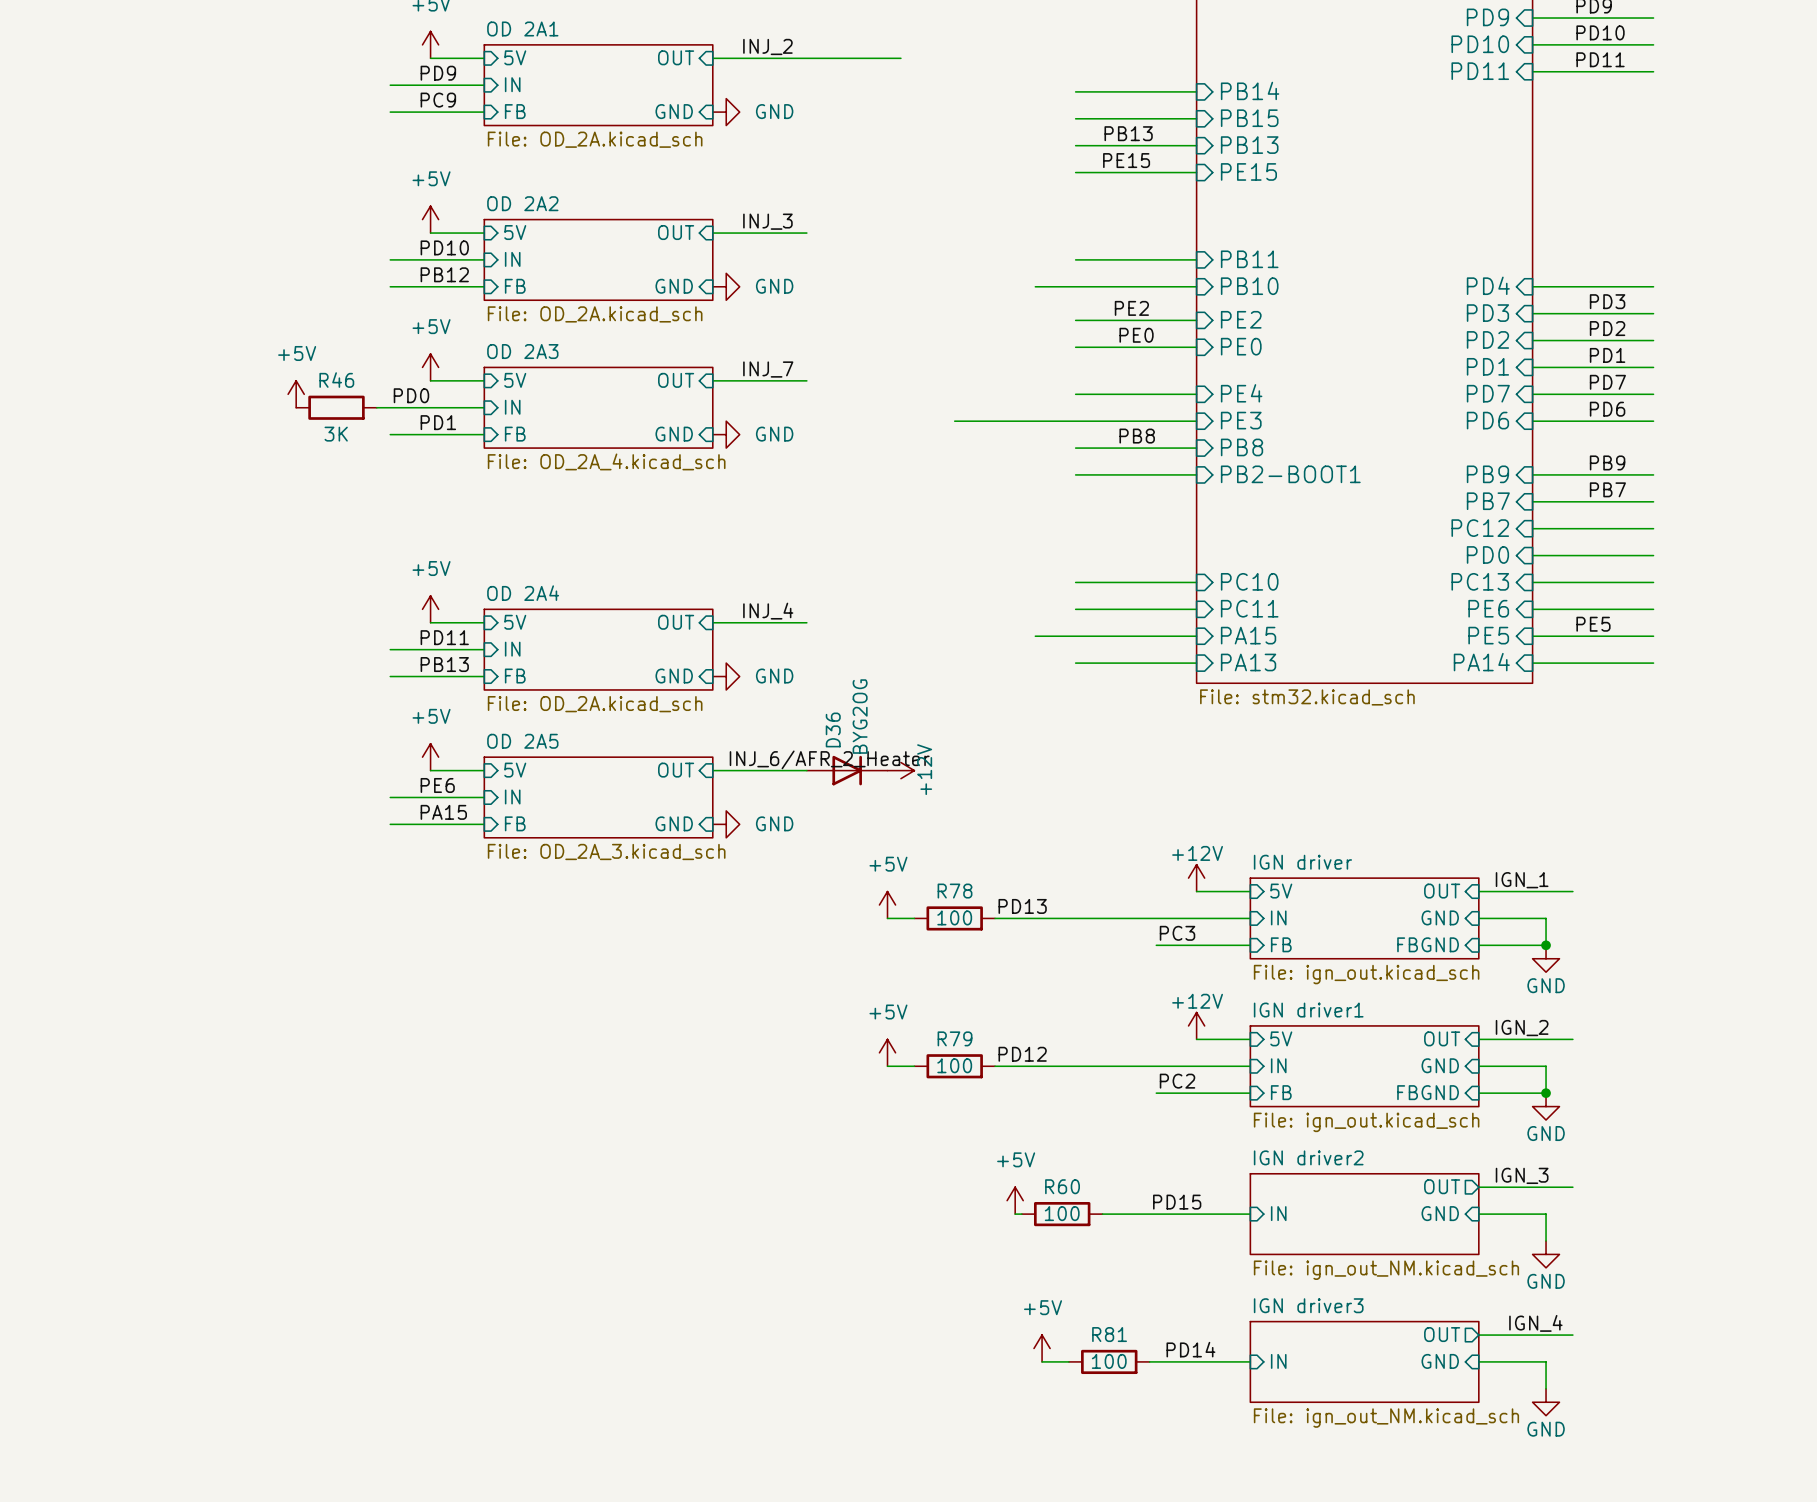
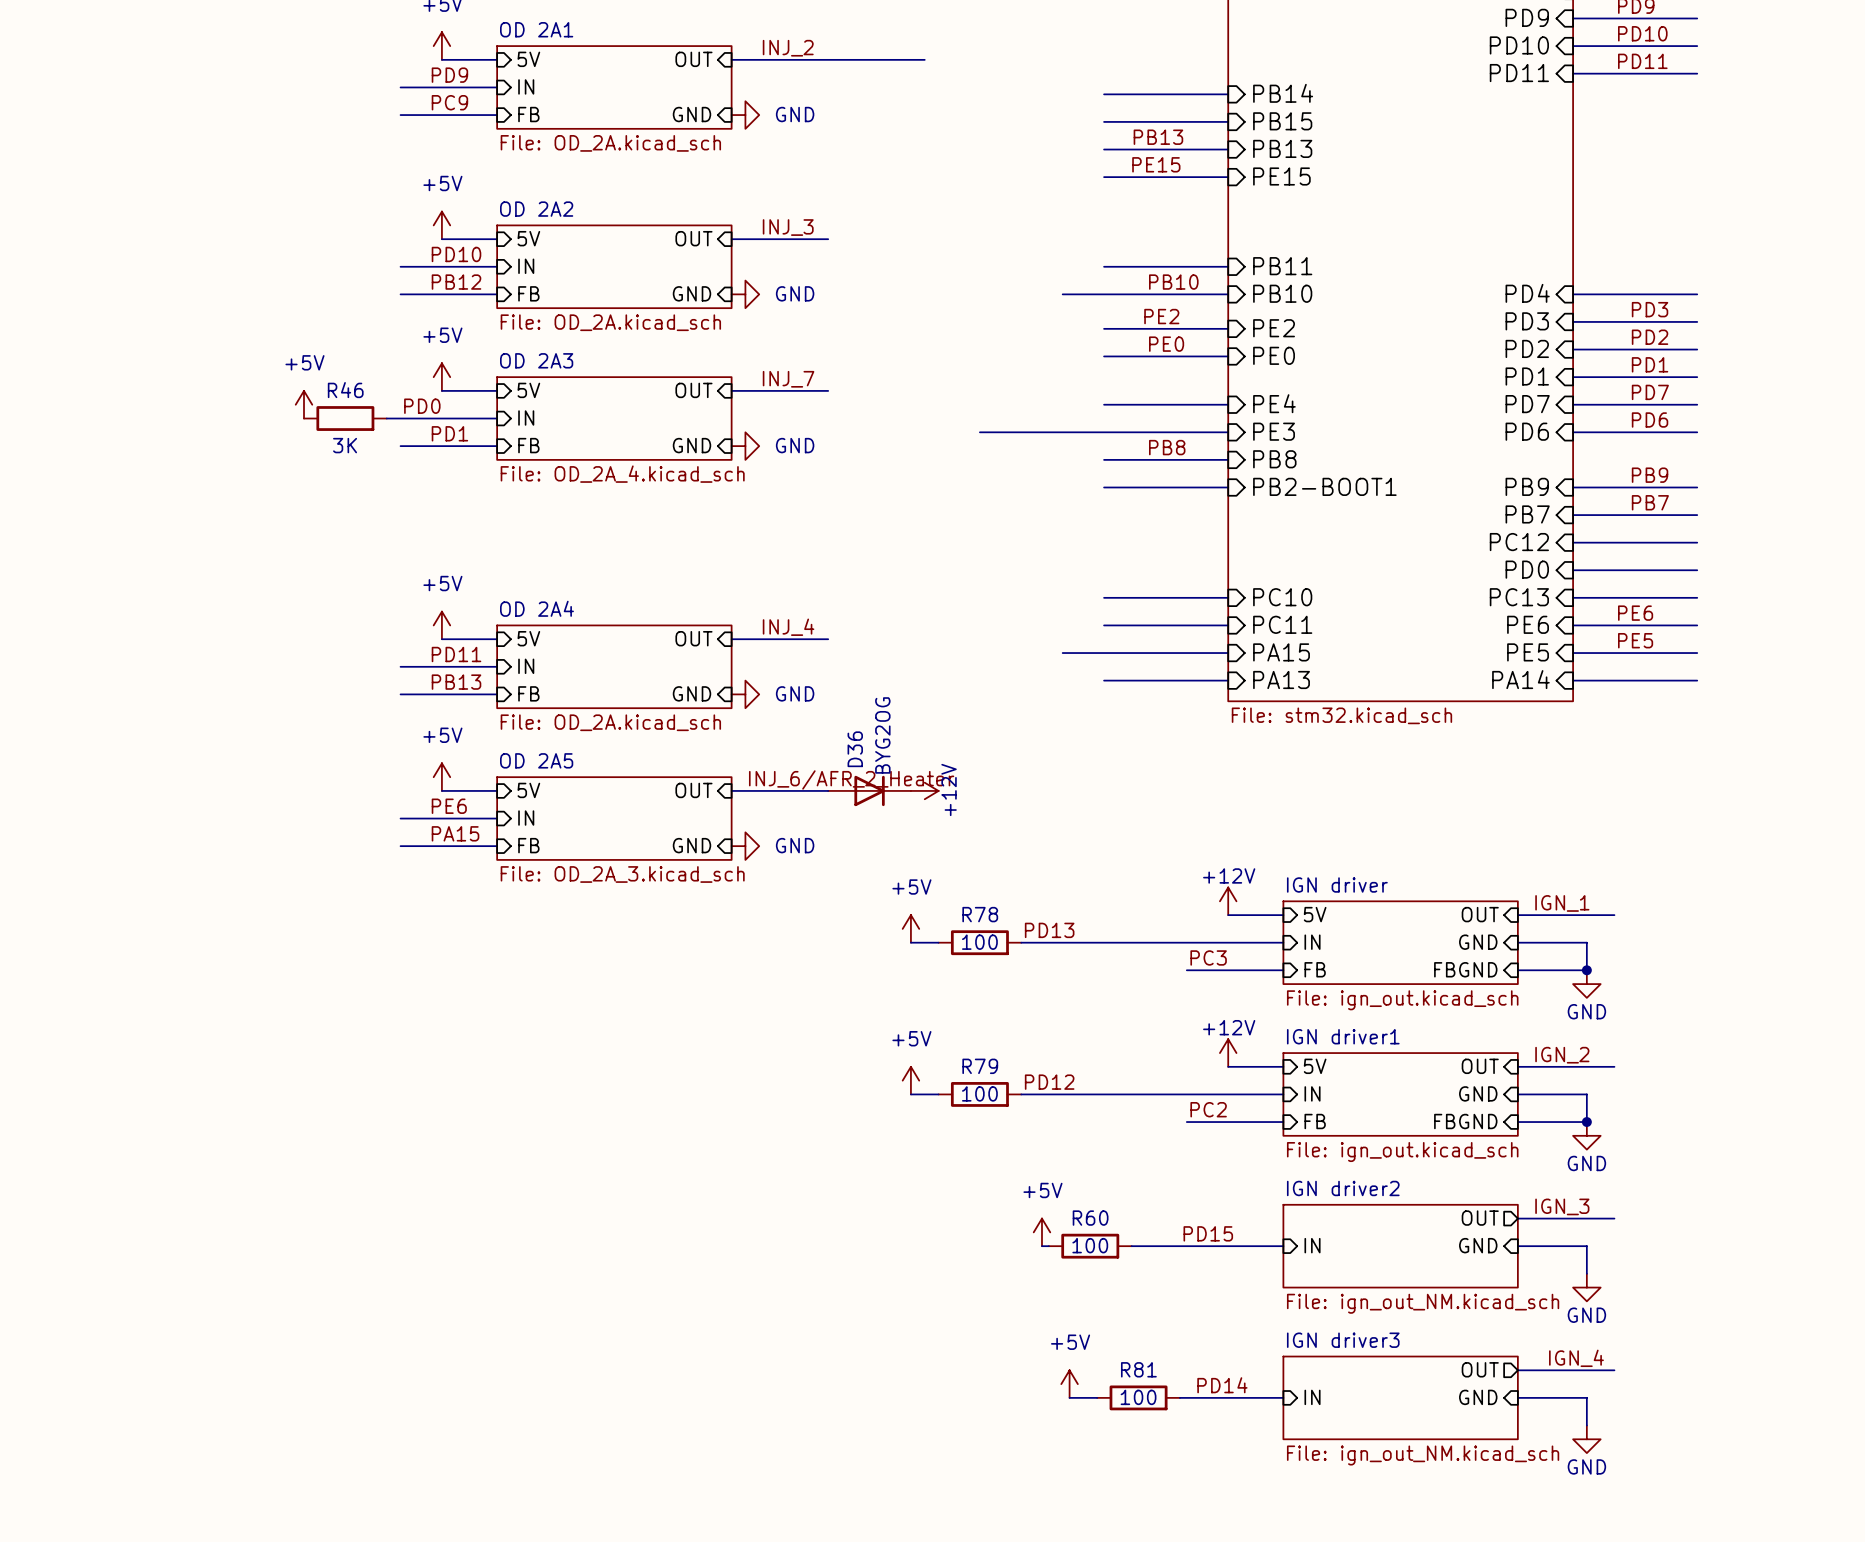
label: none -> PB10 (1173, 282)
label: none -> PE6 (1635, 613)

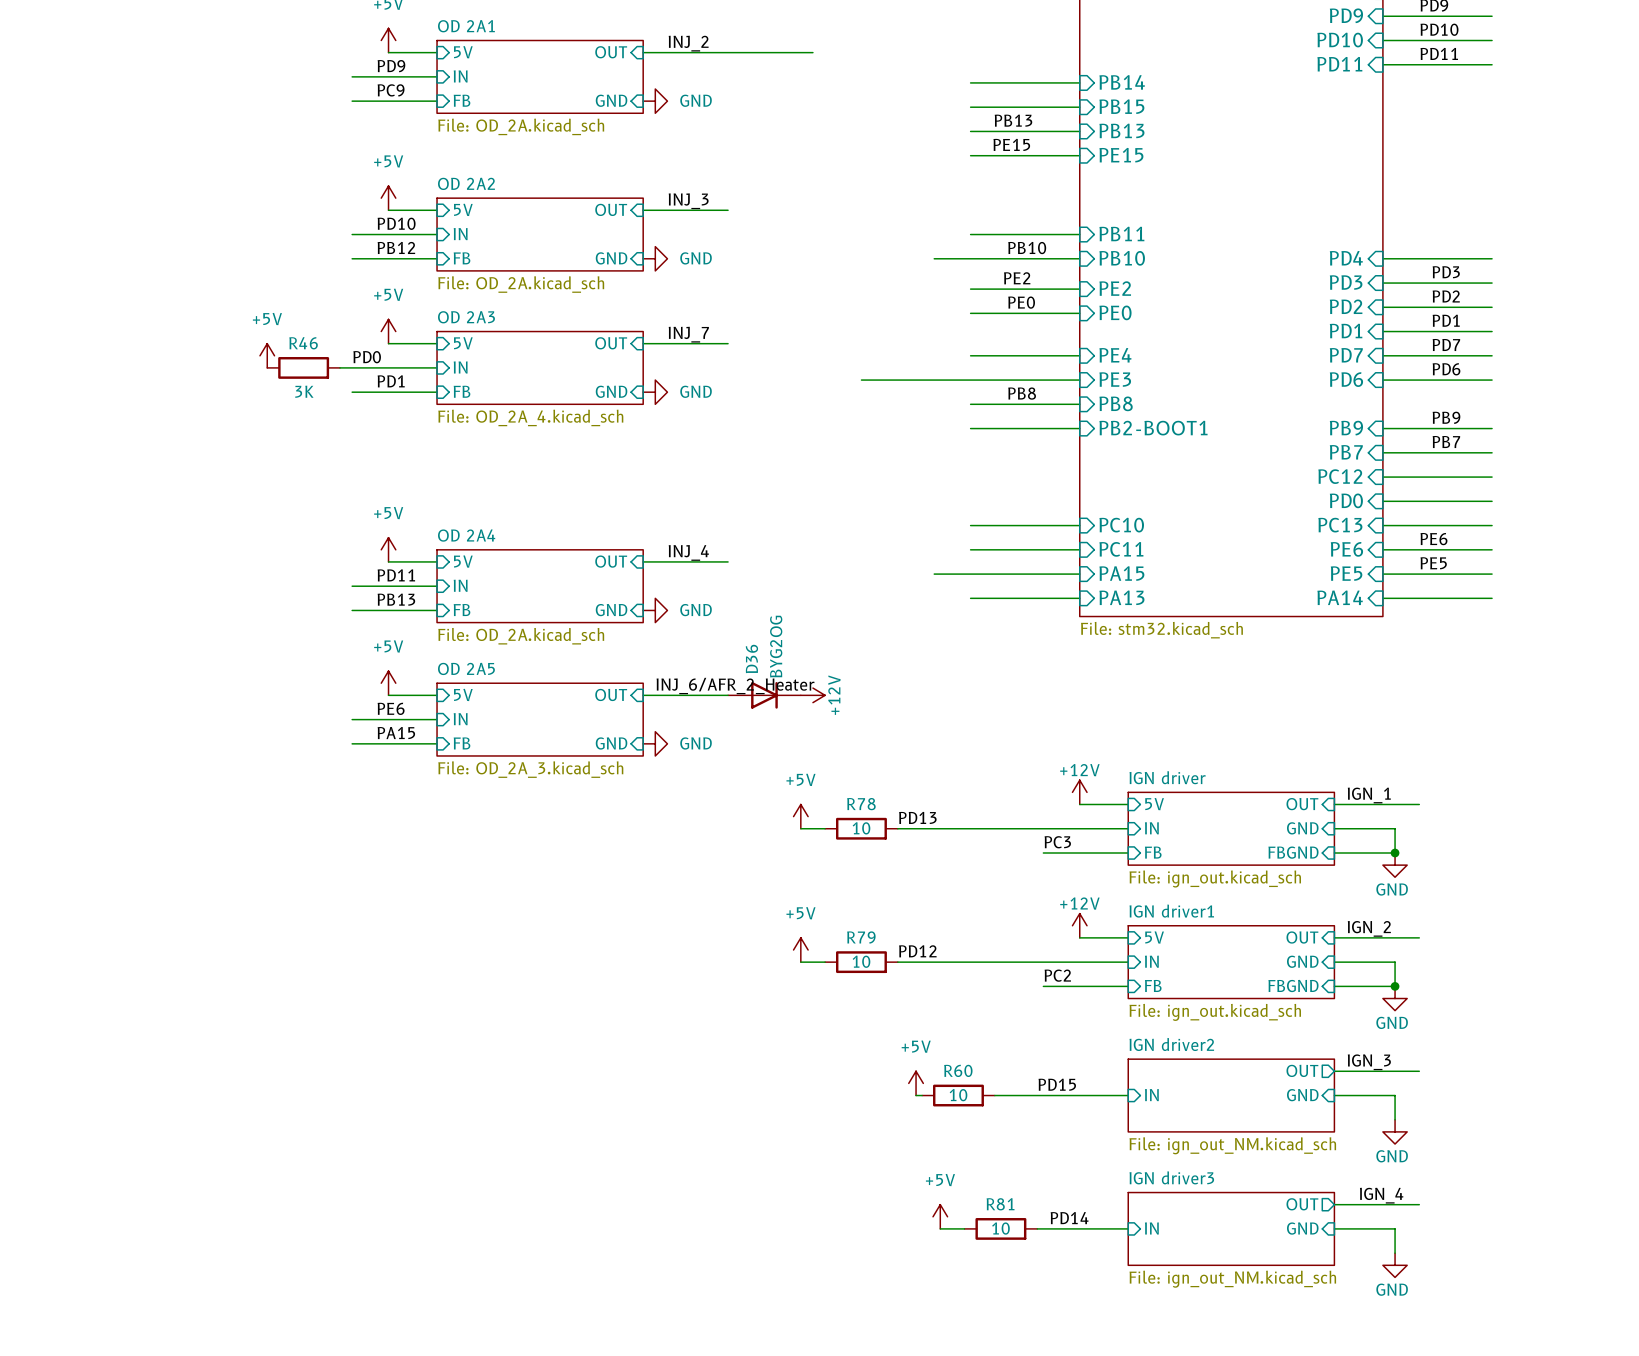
R78 value: 100 (979, 942) -> 10 (861, 828)
R79 value: 100 (979, 1093) -> 10 (861, 961)
R60 value: 100 (1090, 1245) -> 10 (958, 1095)
R81 value: 100 (1138, 1397) -> 10 (1000, 1228)

